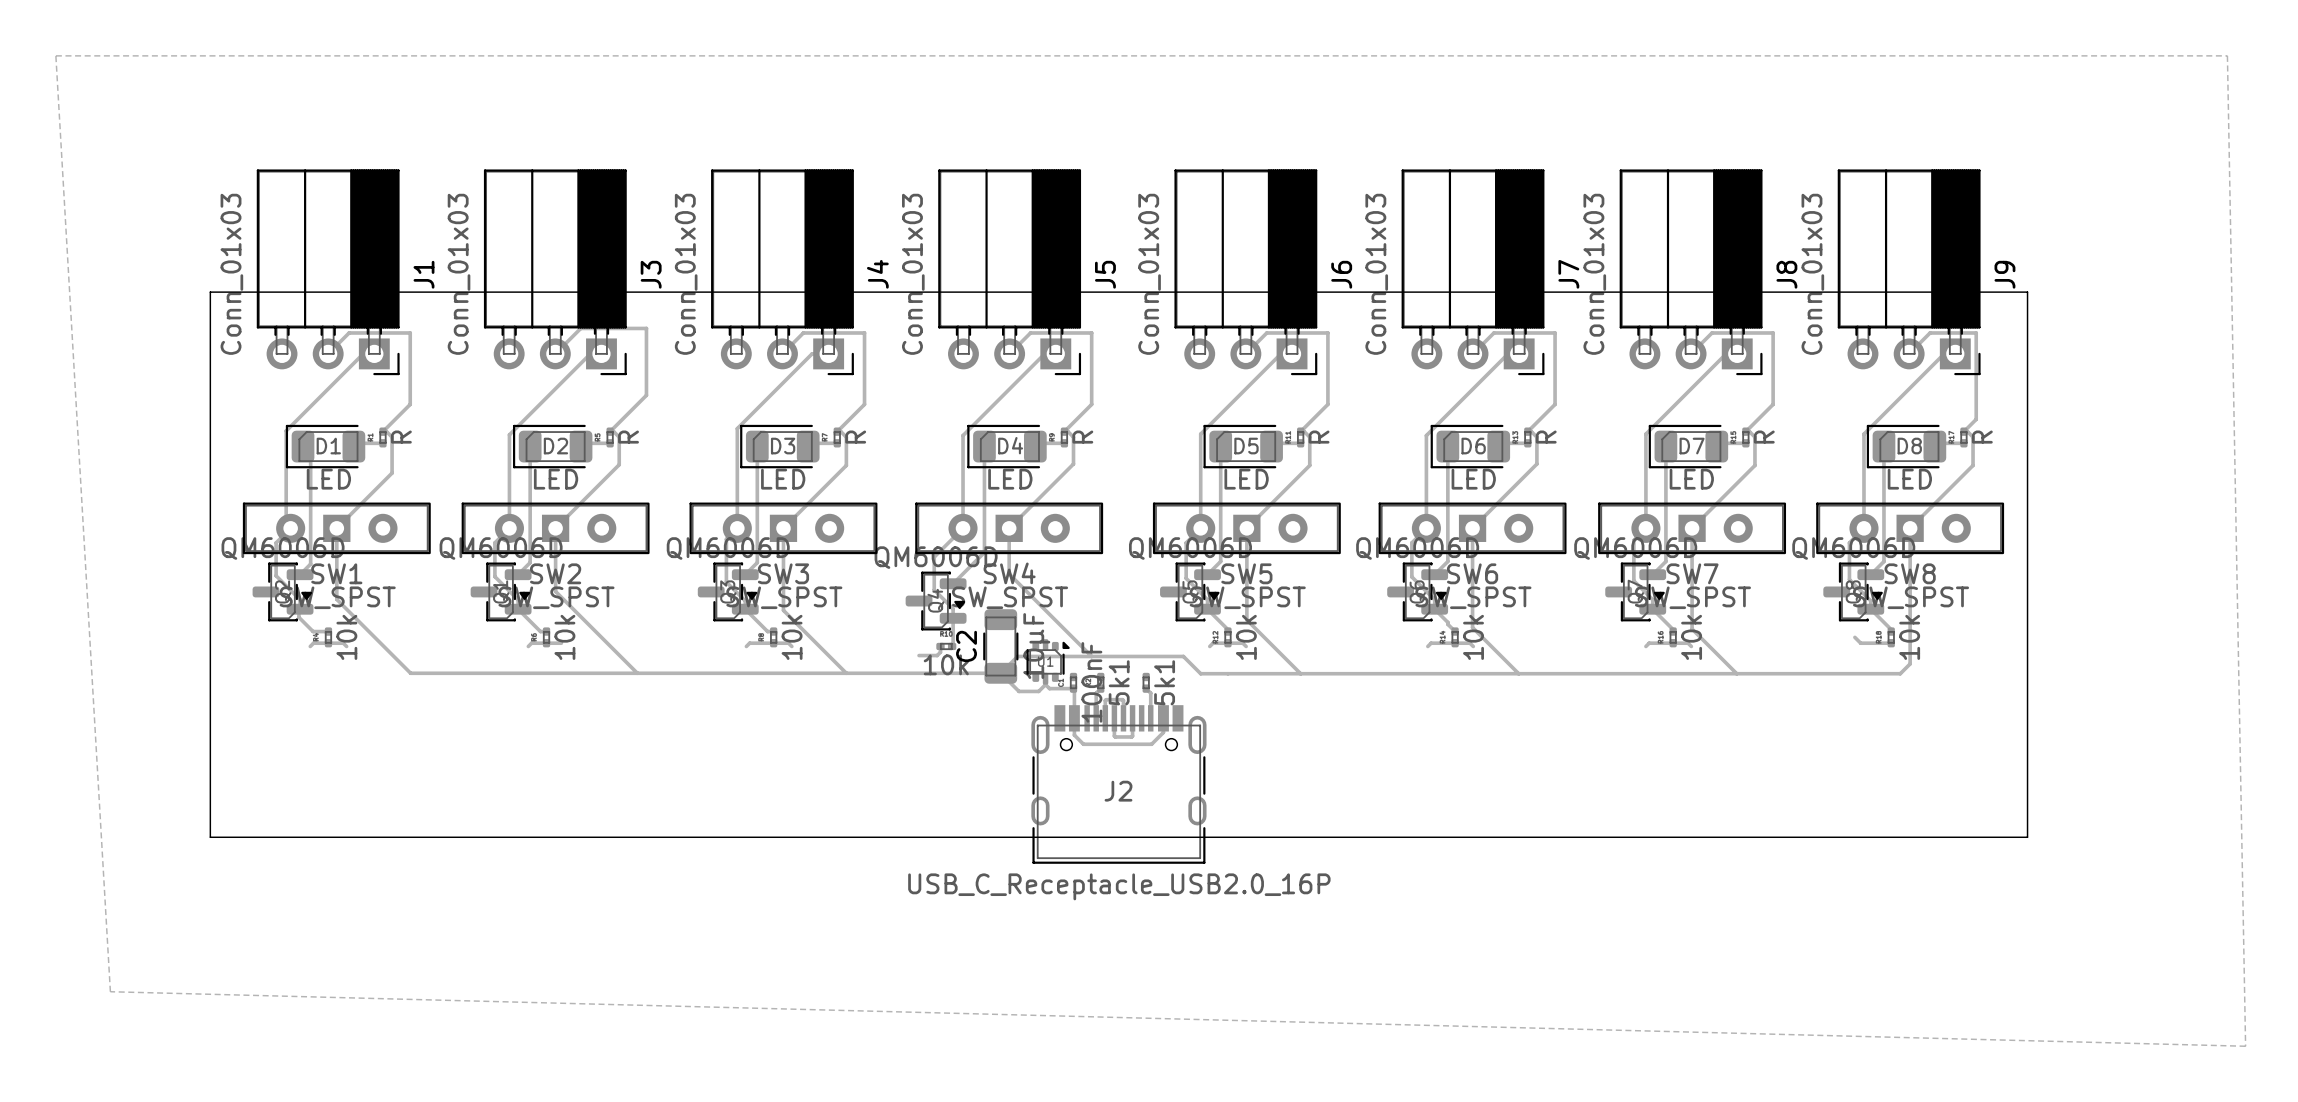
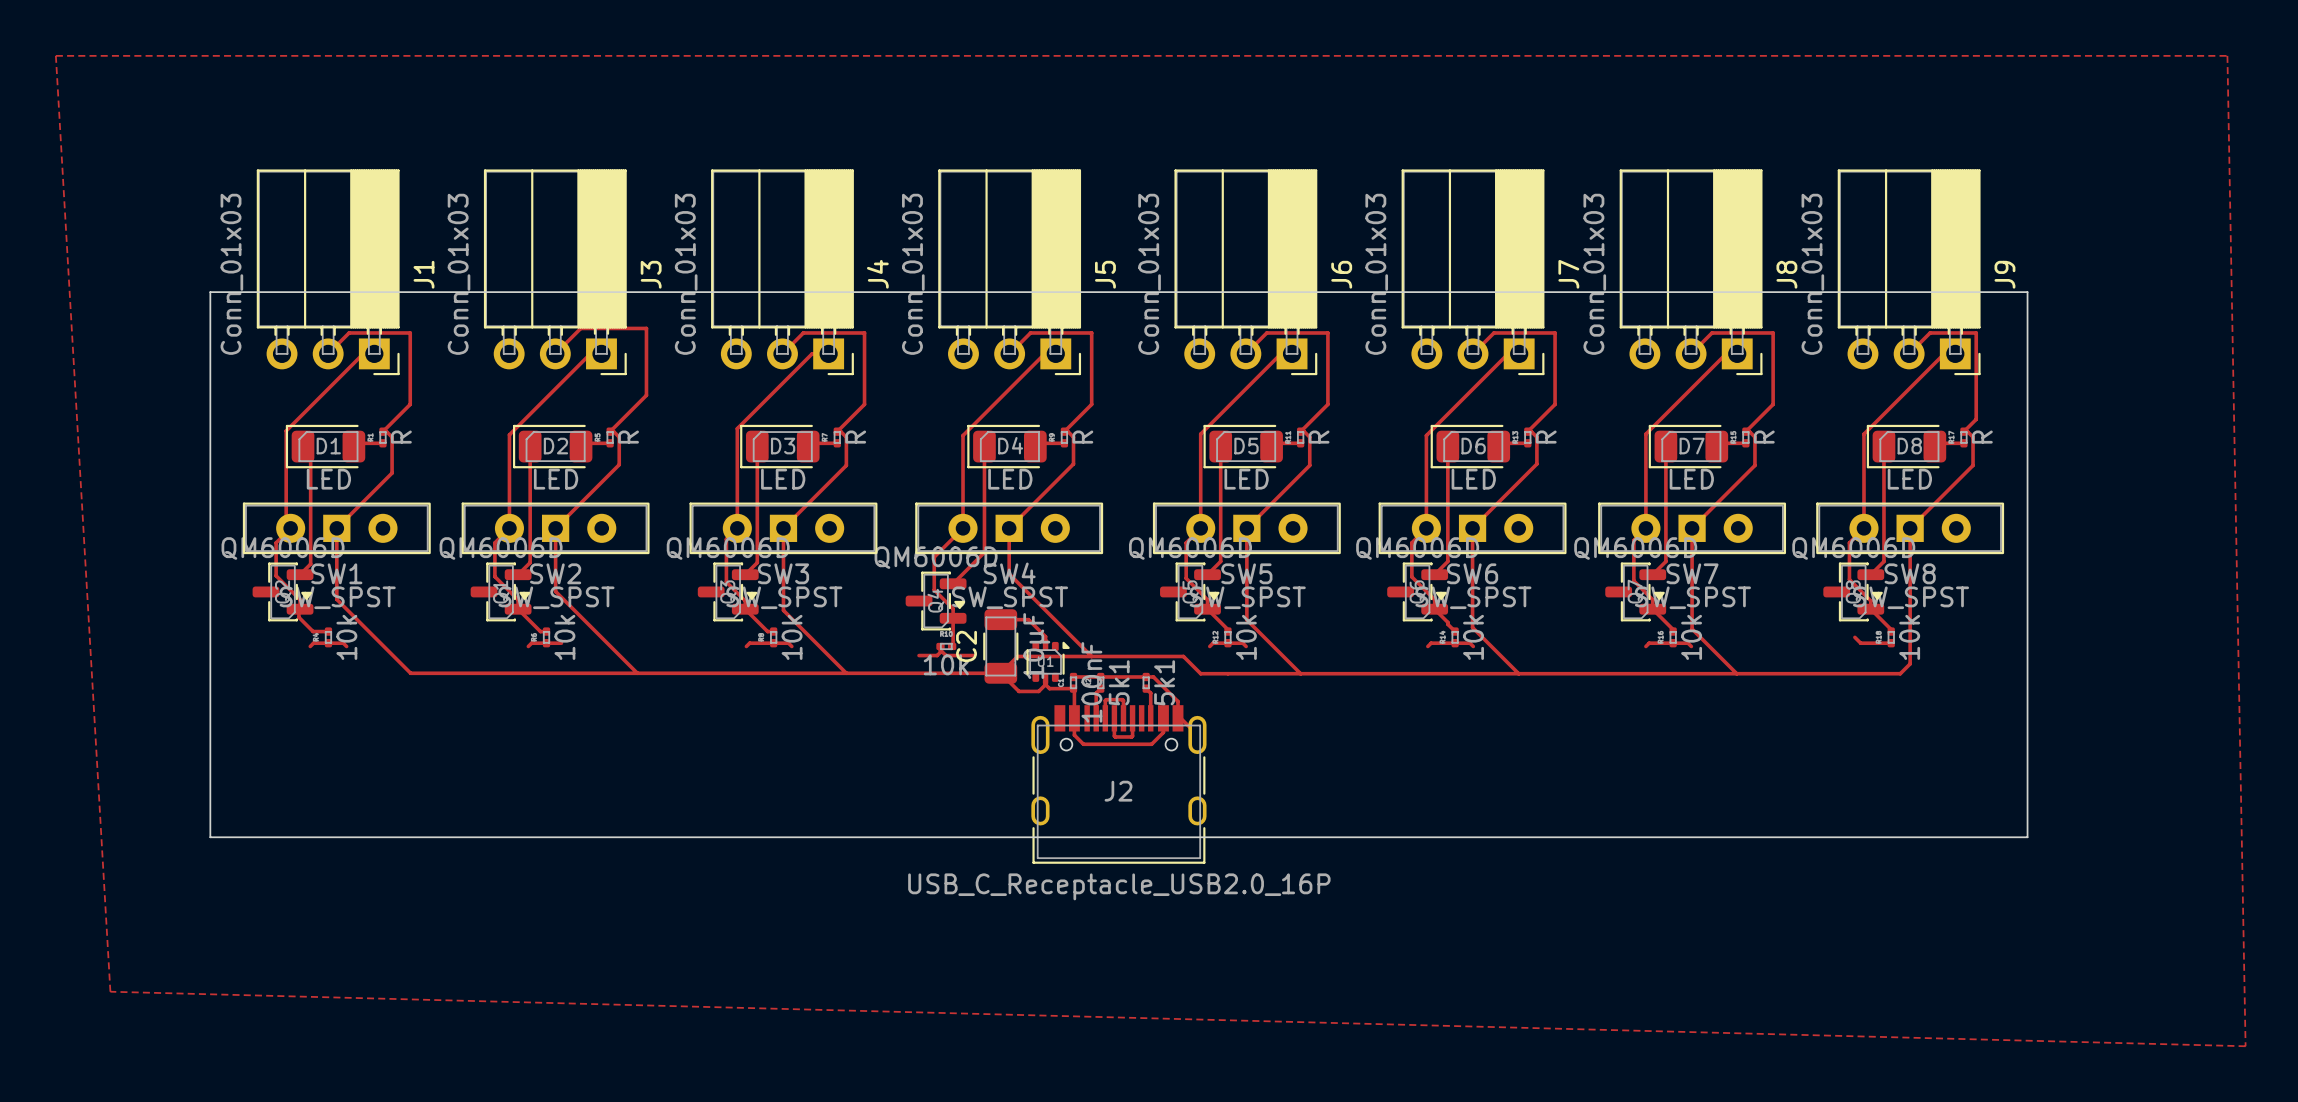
track: none -> (1000, 619) (1028, 619) (1045, 636) (1045, 645)
track: none -> (940, 650) (945, 655) (973, 655)
track: none -> (1073, 676) (1153, 676) (1177, 701) (1177, 718) (1180, 718) (1197, 734)

